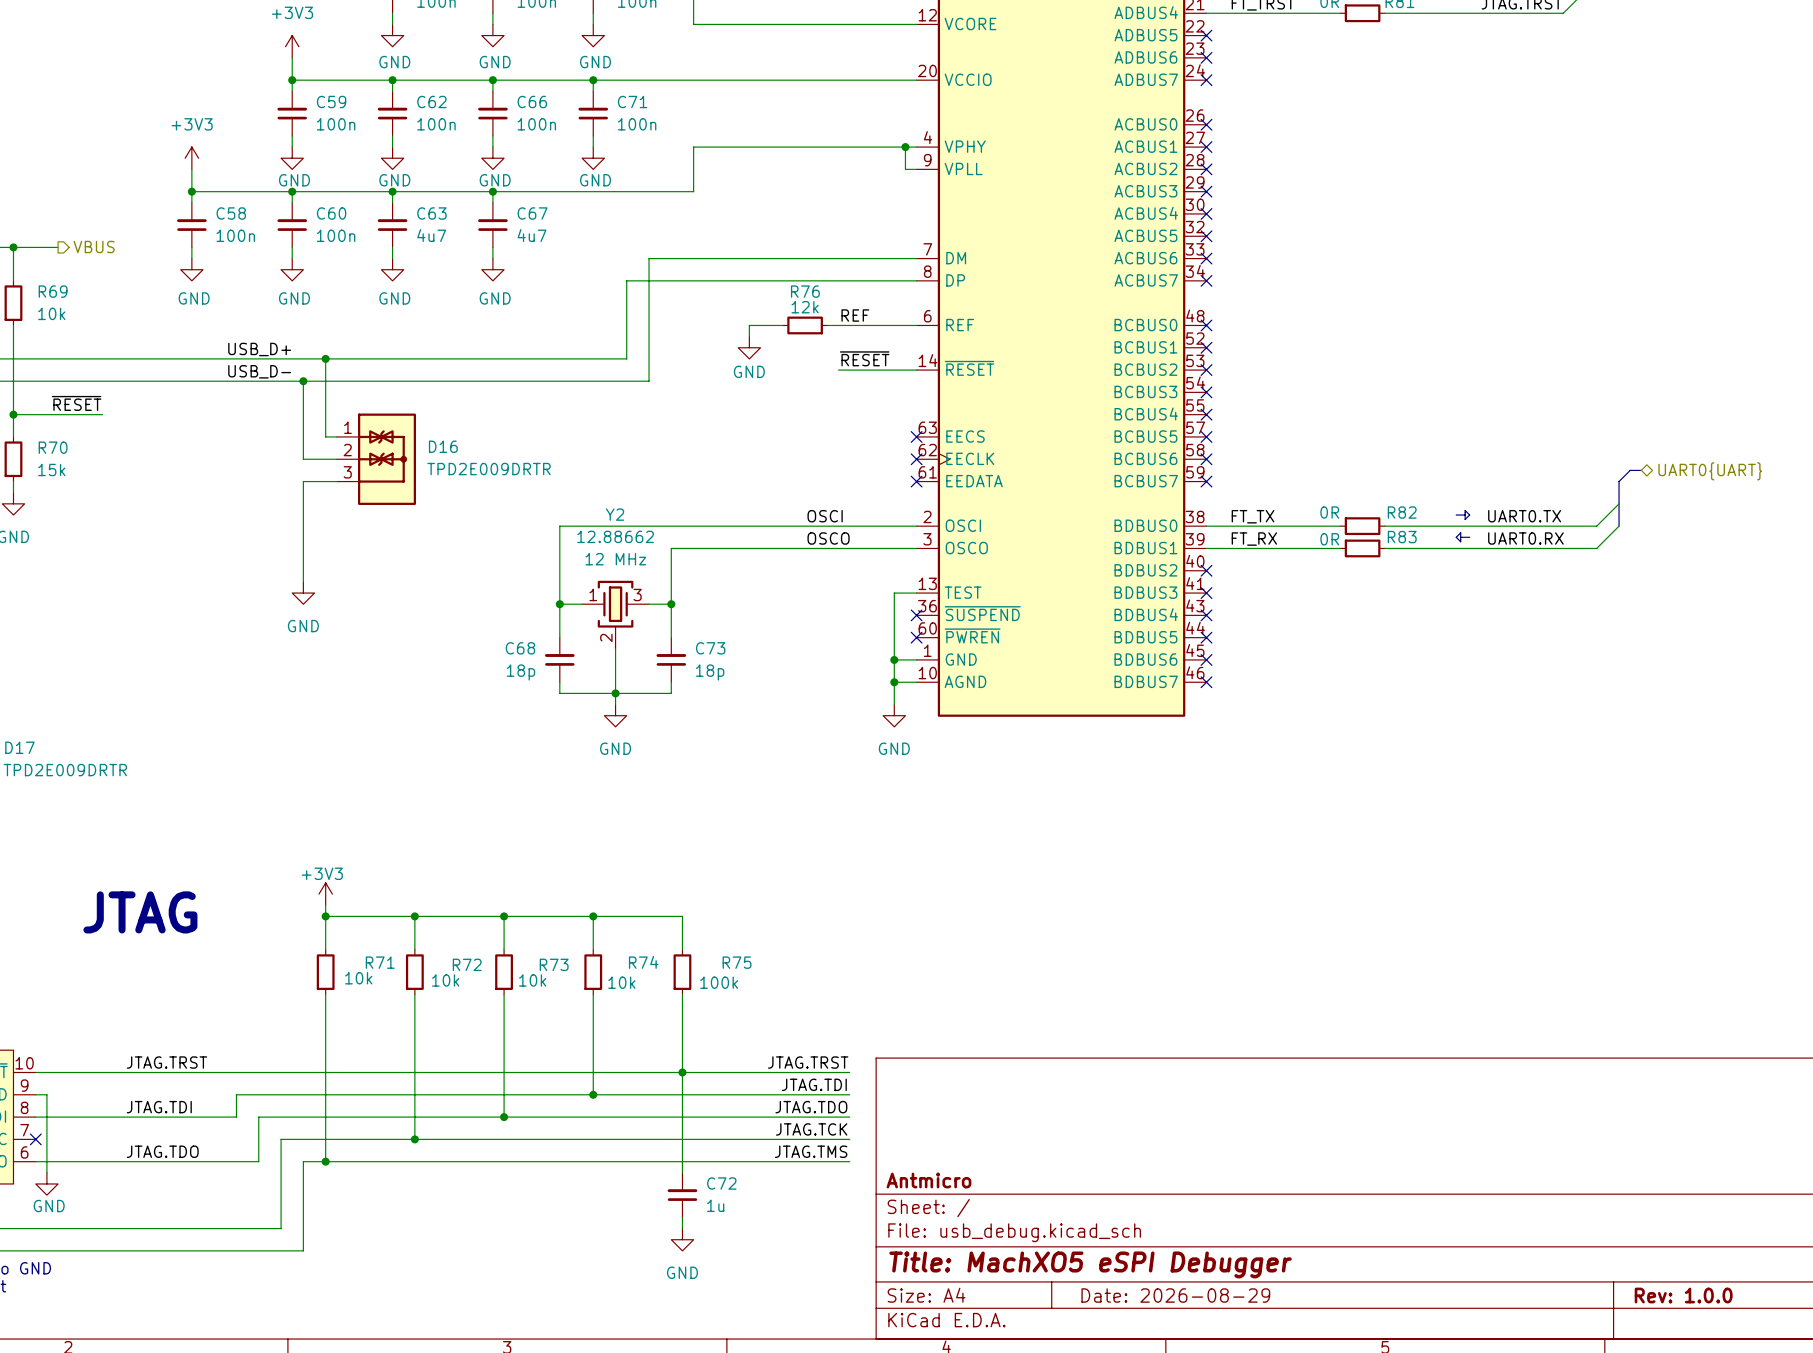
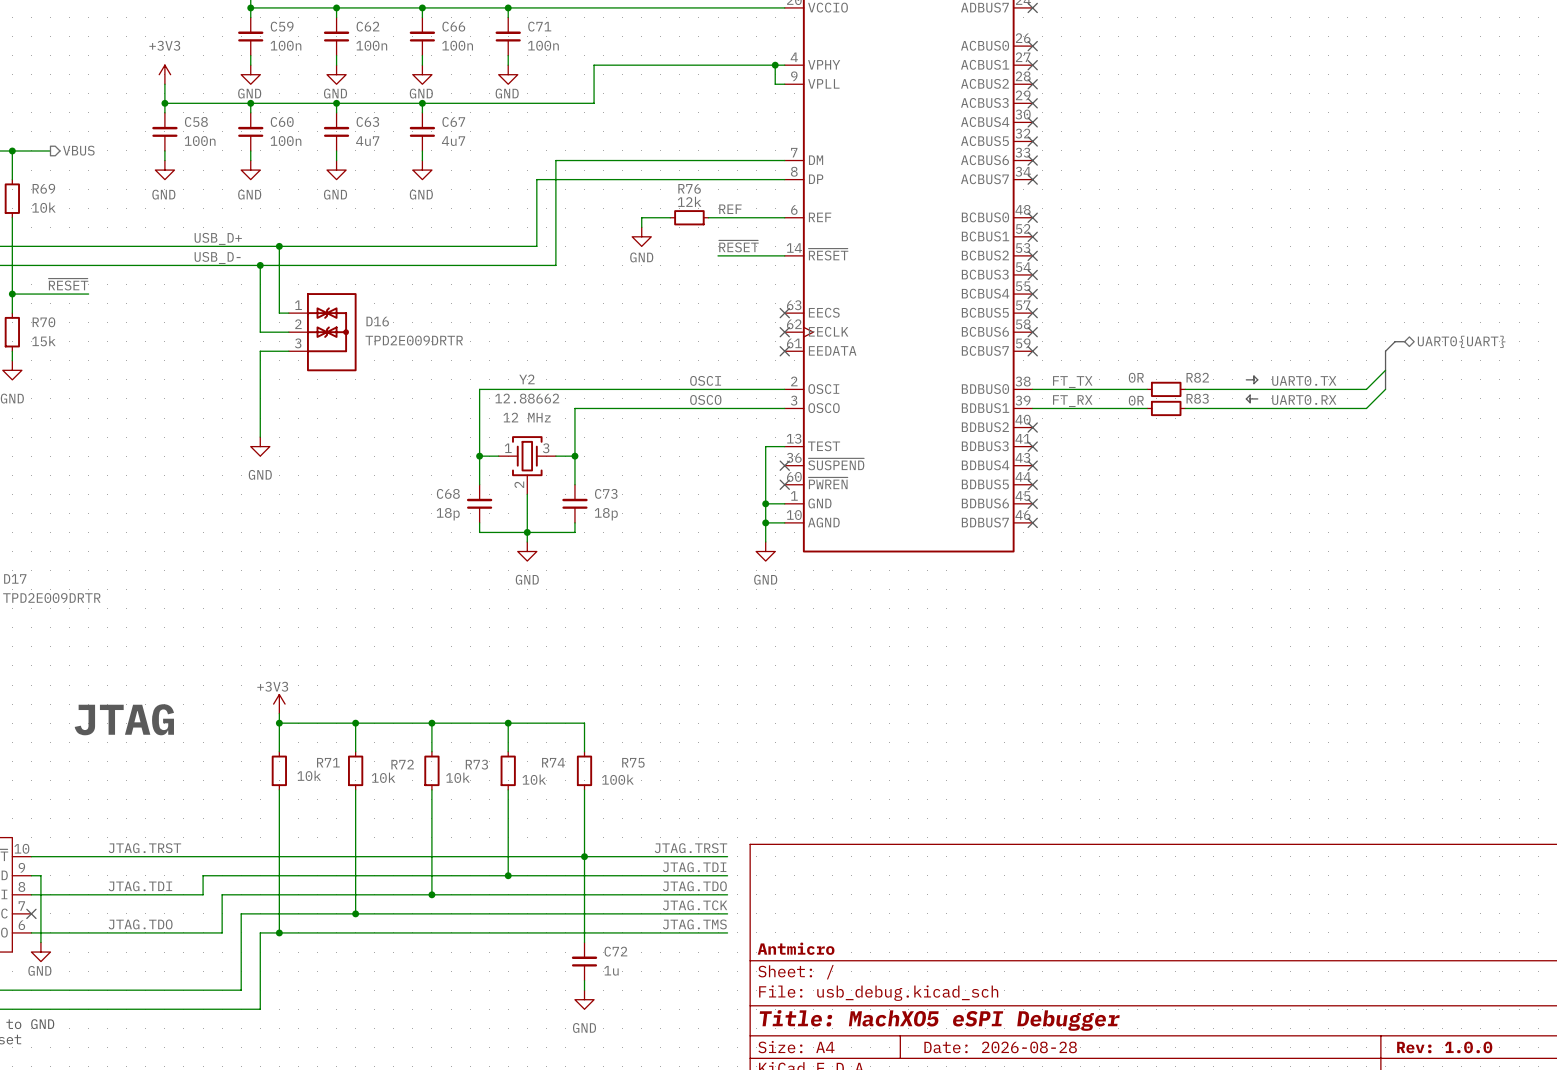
title block: Date: 2026-08-29 (1175, 1295) -> Date: 2026-08-28 (1000, 1047)

